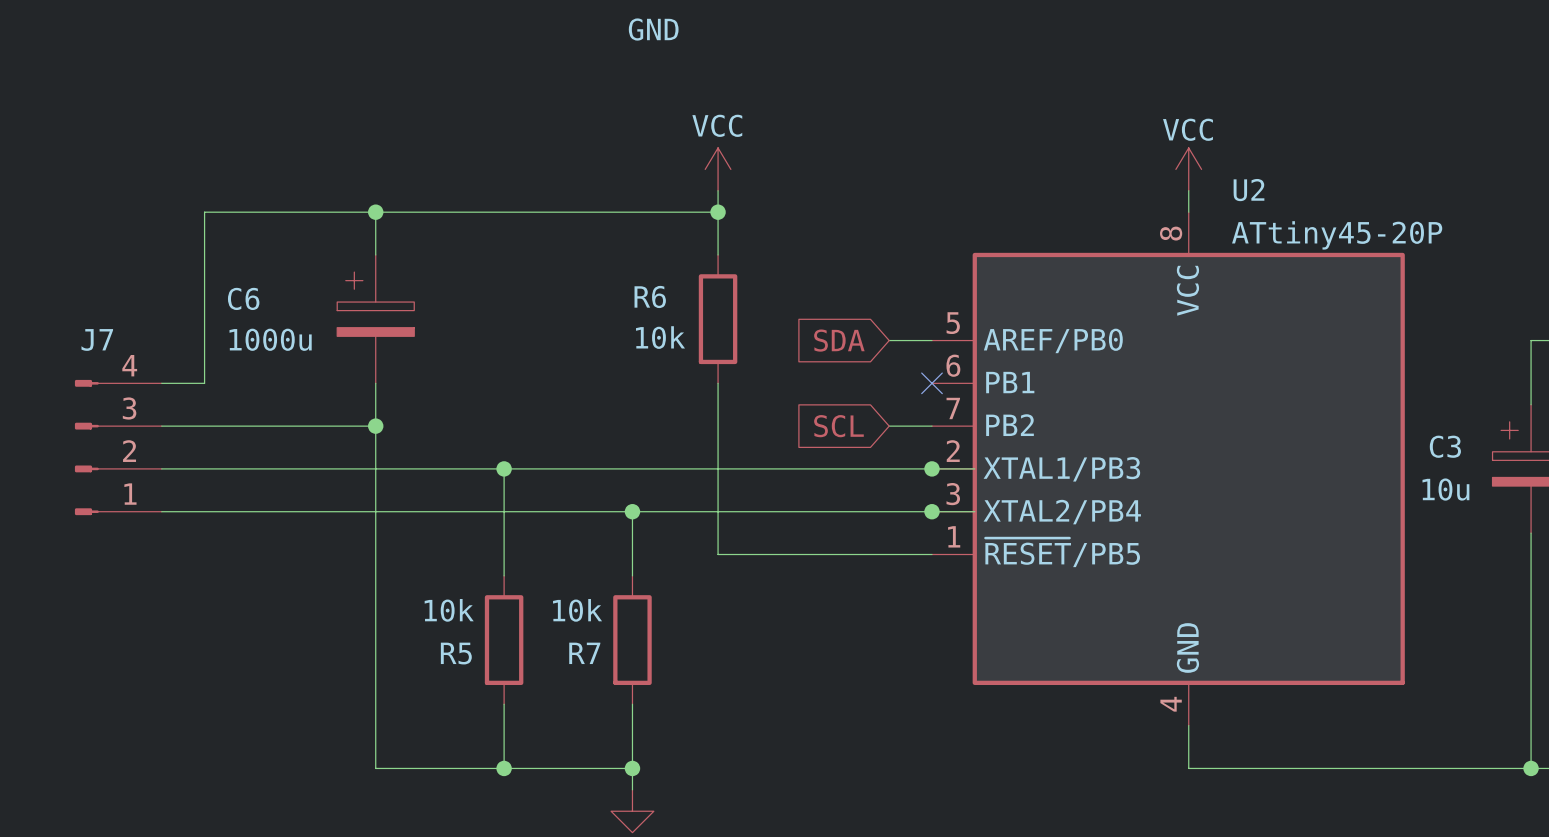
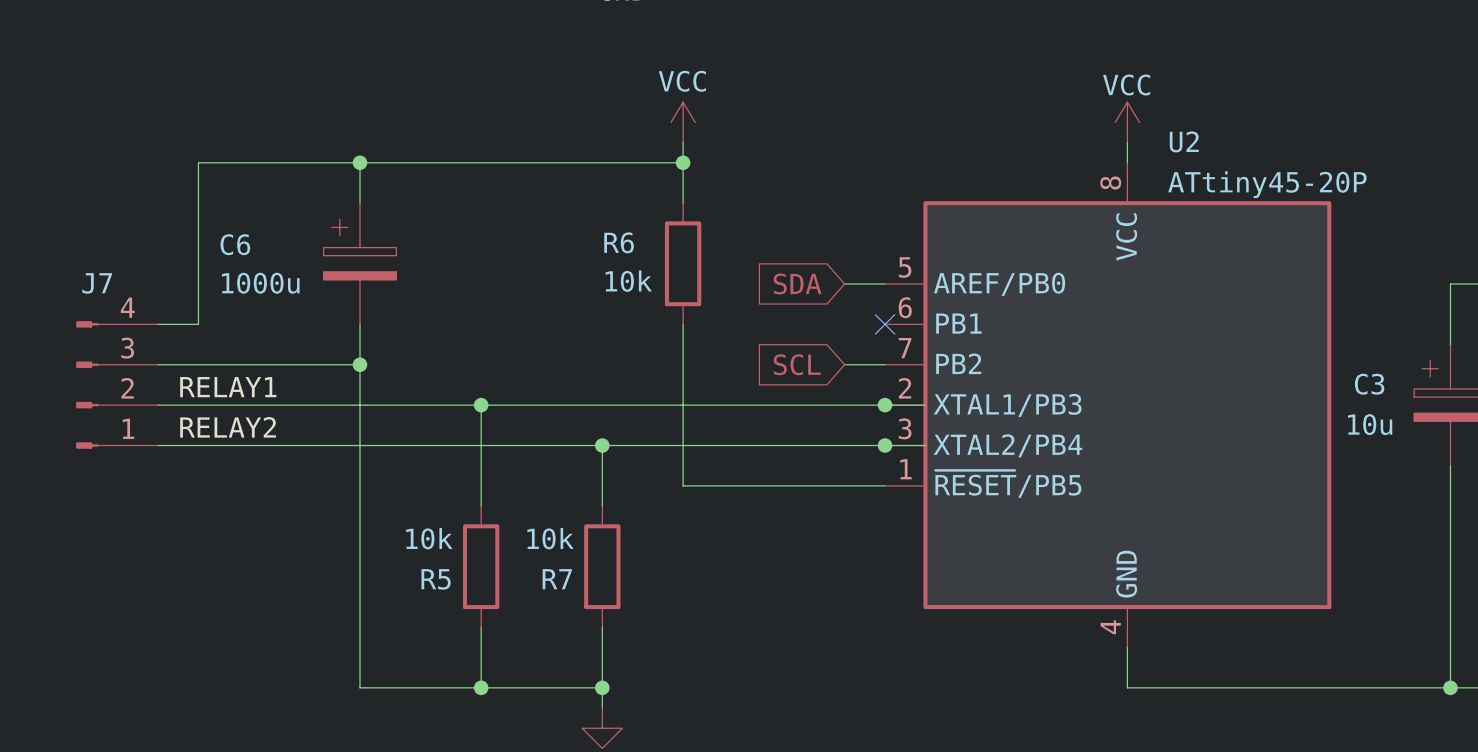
label: none -> RELAY1 (228, 387)
label: none -> RELAY2 (228, 427)

